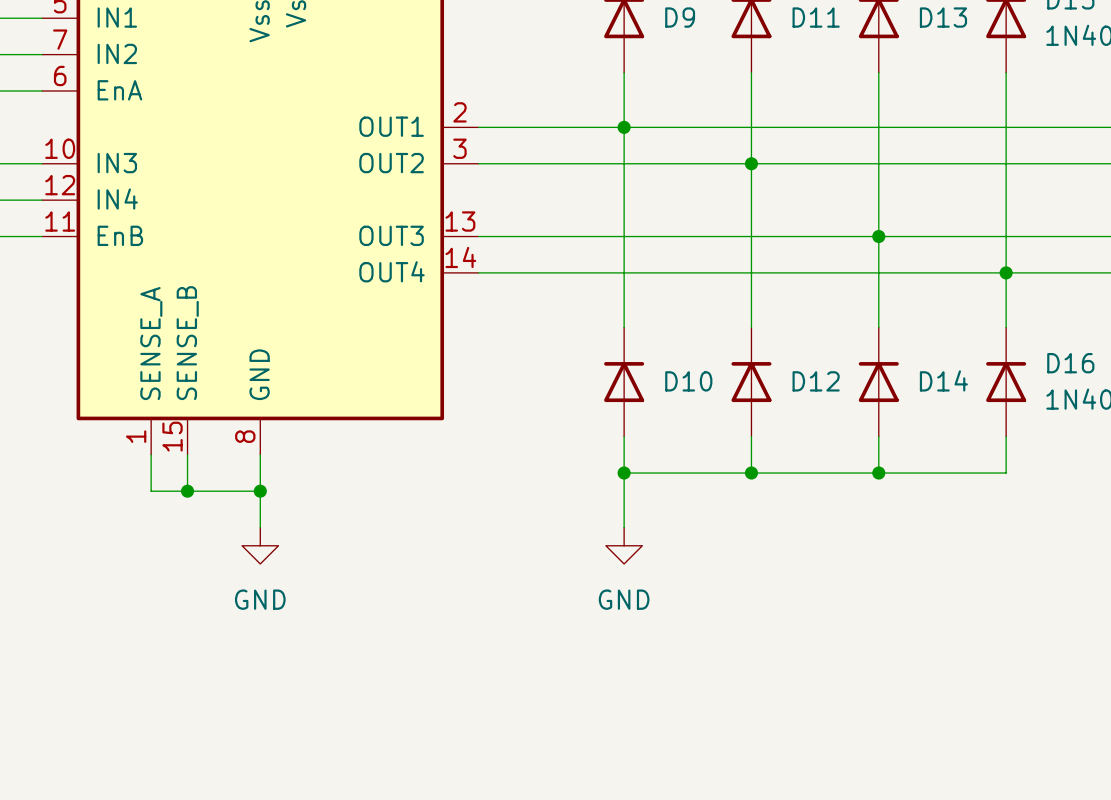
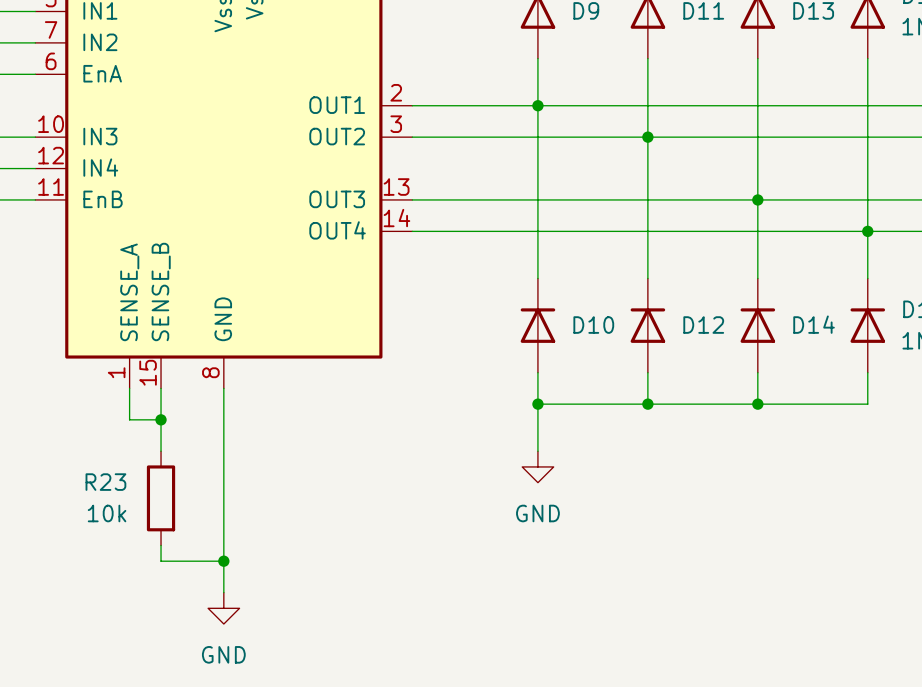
wire: (187, 491) (260, 491) -> (161, 419) (161, 451)
junction: (260, 491) -> none
wire: none -> (223, 451) (223, 592)
power symbol position: GND (260, 545) -> GND (223, 608)
R23: none -> 10k (161, 498)
wire: none -> (161, 545) (161, 561) (223, 561)
junction: none -> (223, 561)

